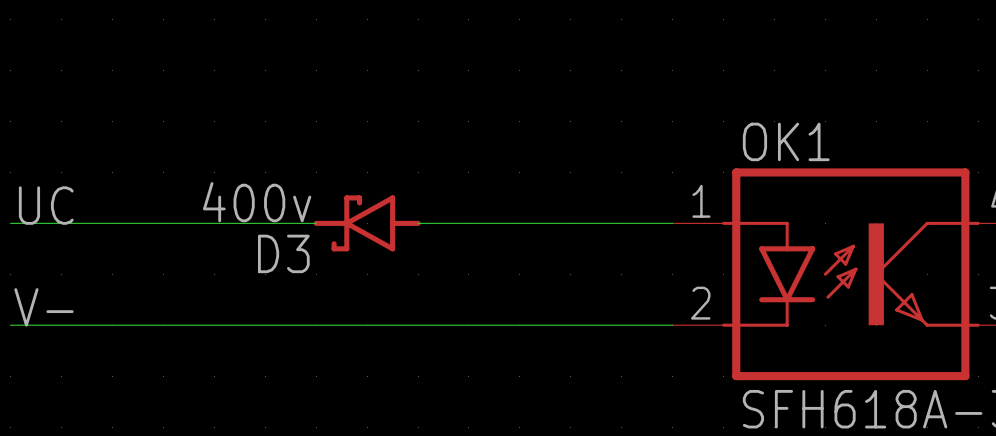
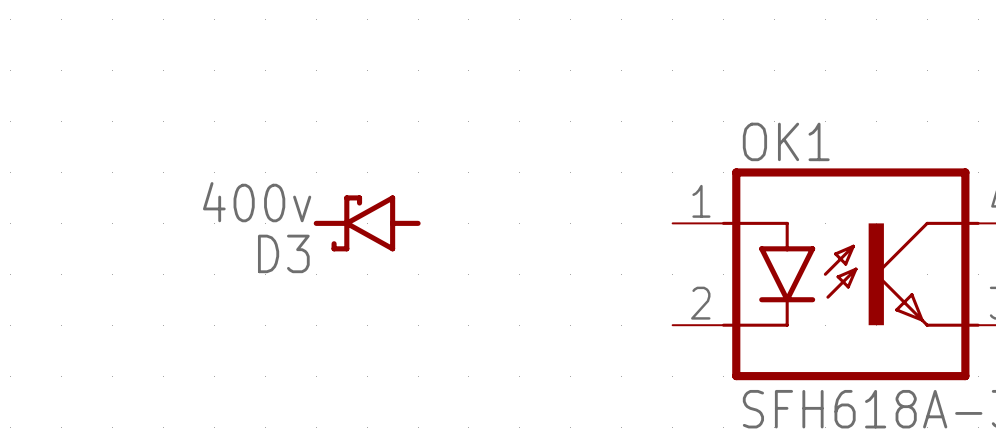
label: UC (46, 205) -> none
wire: (10, 223) (316, 223) -> none
wire: (418, 223) (672, 223) -> none
label: V- (43, 307) -> none
wire: (10, 325) (672, 325) -> none

